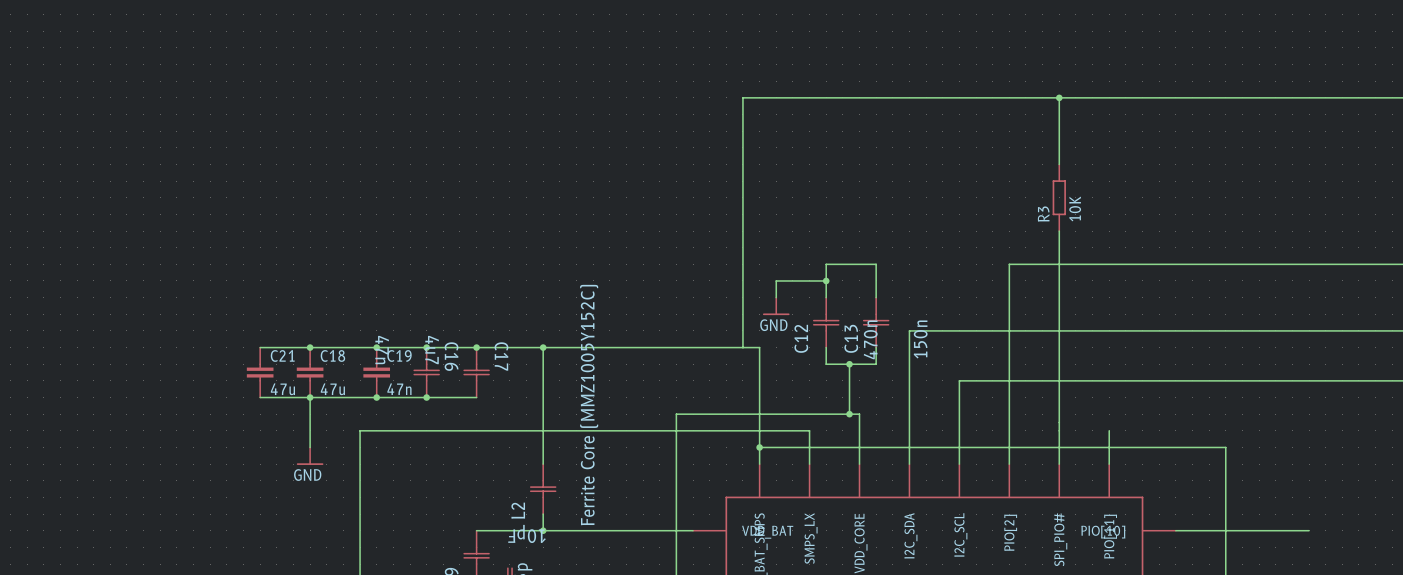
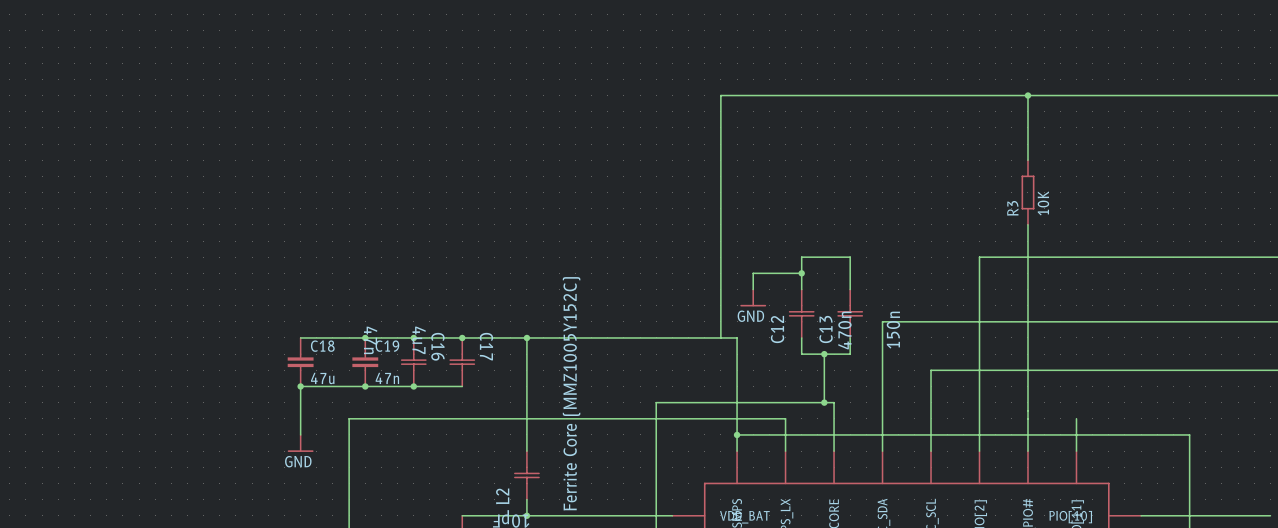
wire: (260, 347) (310, 347) -> none
junction: (310, 347) -> none
C21: 47u (260, 372) -> none
wire: (260, 397) (310, 397) -> none

